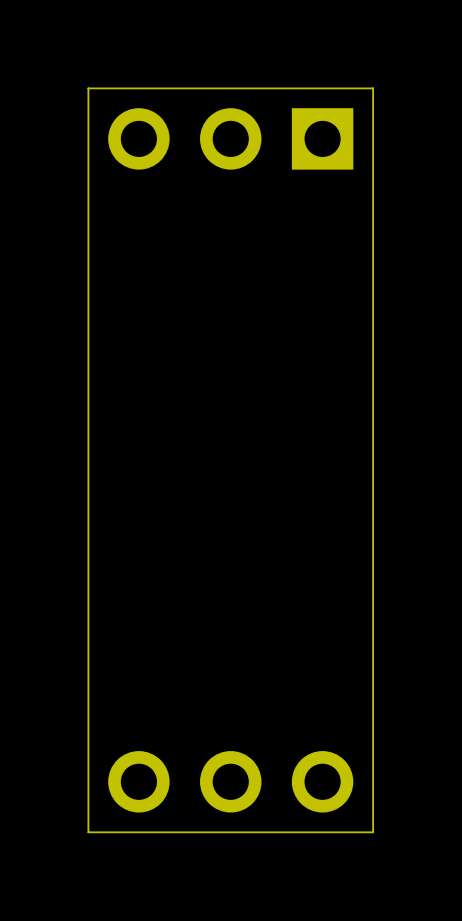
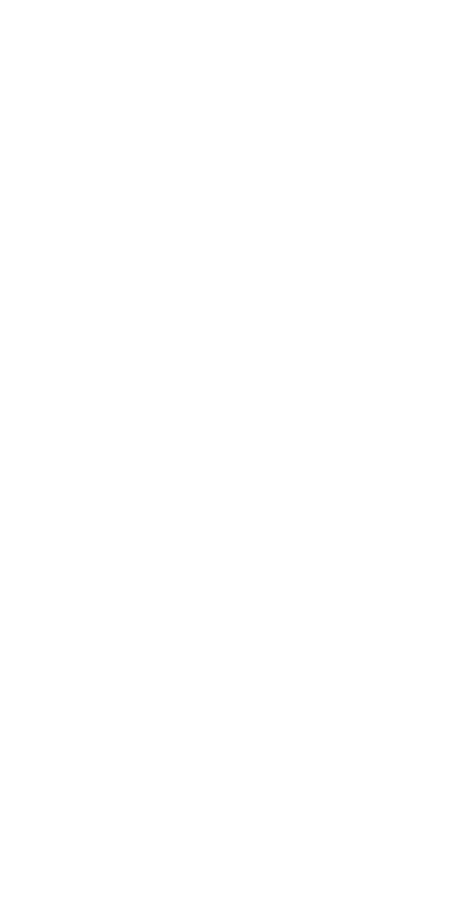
board edge: (373, 88) (88, 88) (88, 832) (373, 832) (373, 88) -> none
part: (230, 138) -> none
part: (230, 781) -> none

